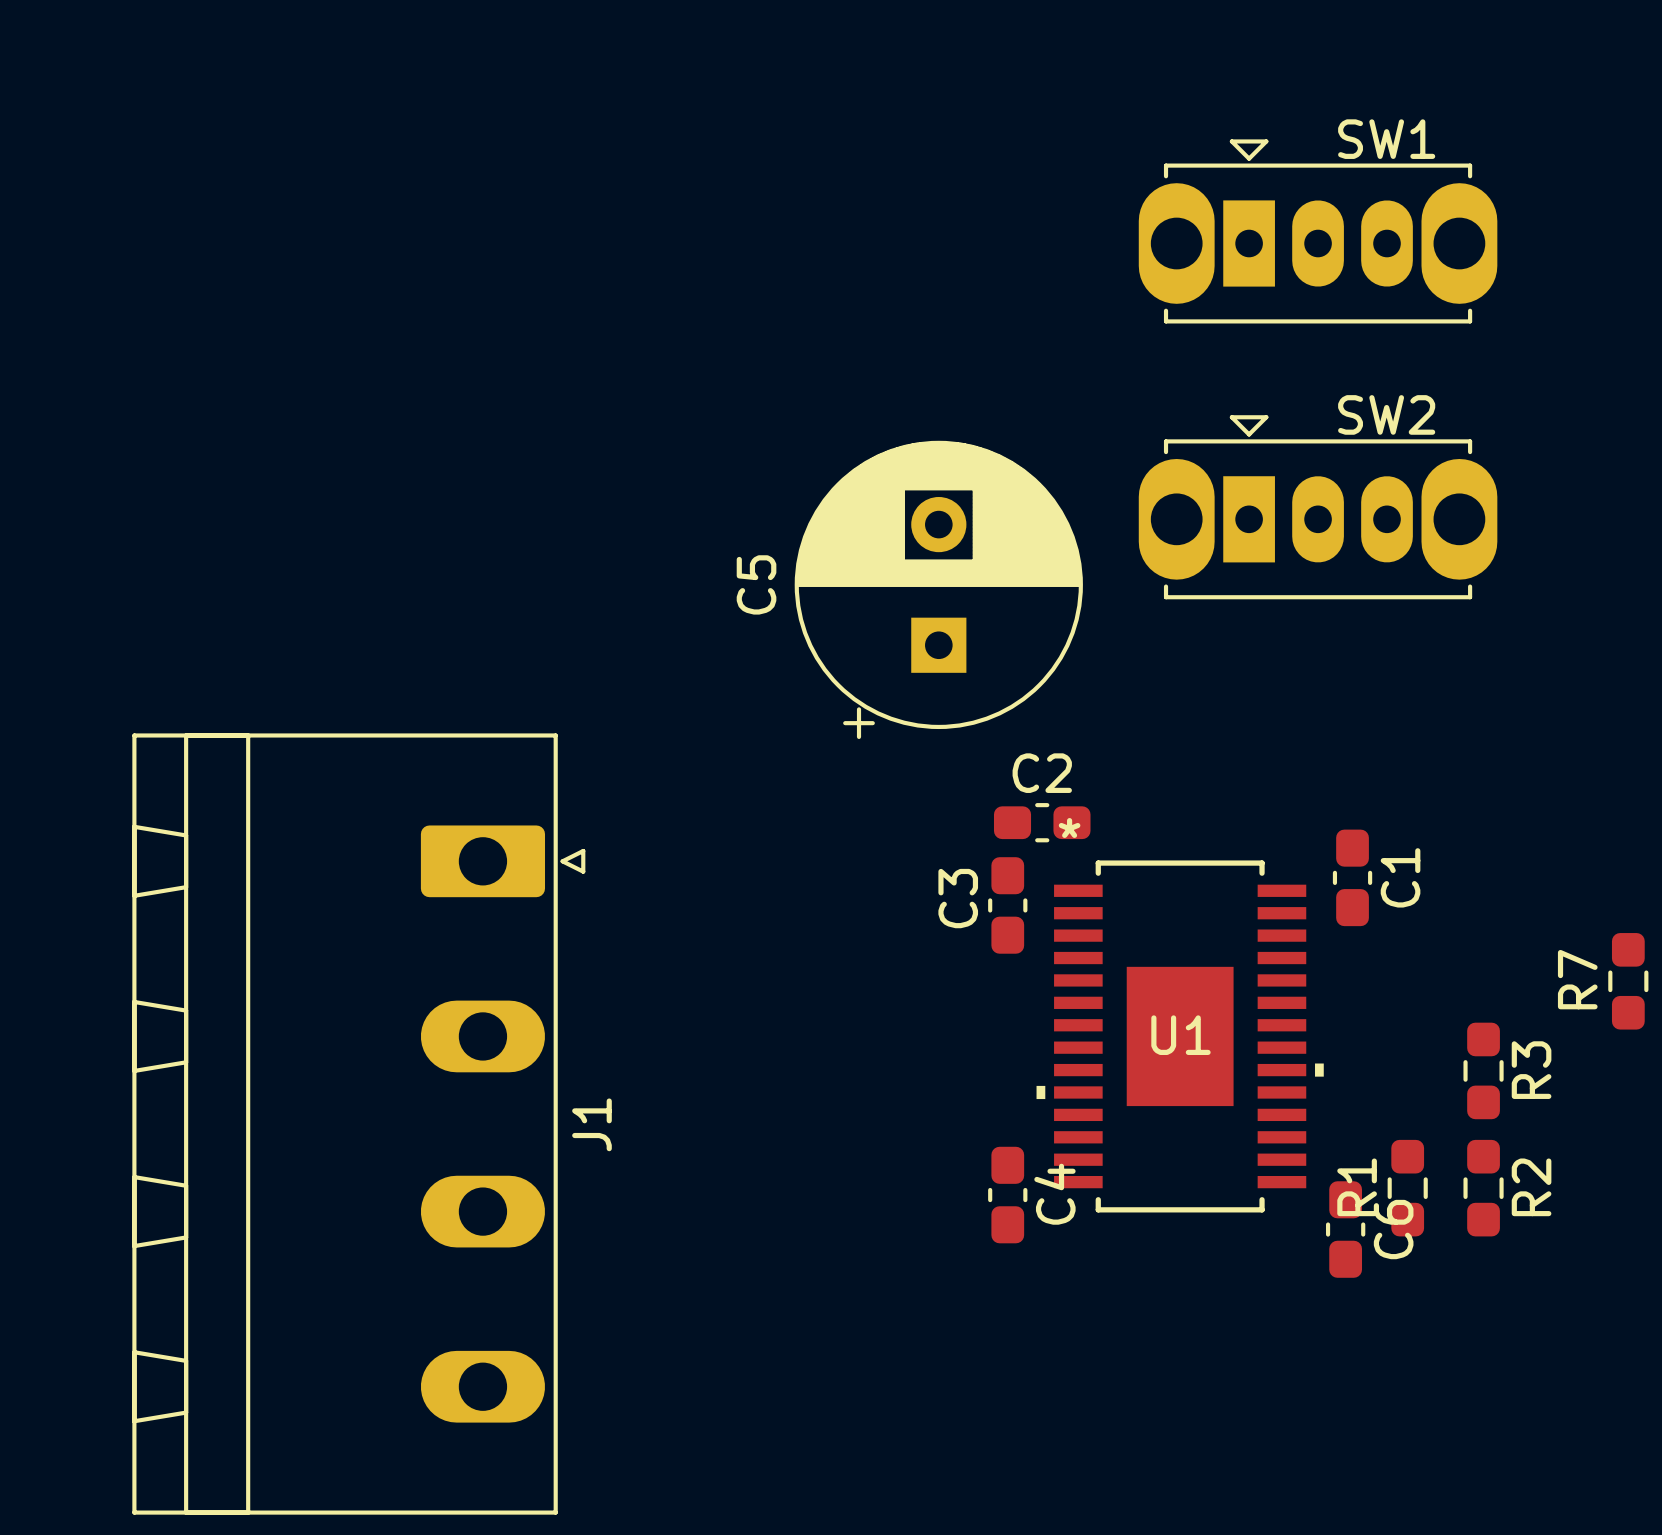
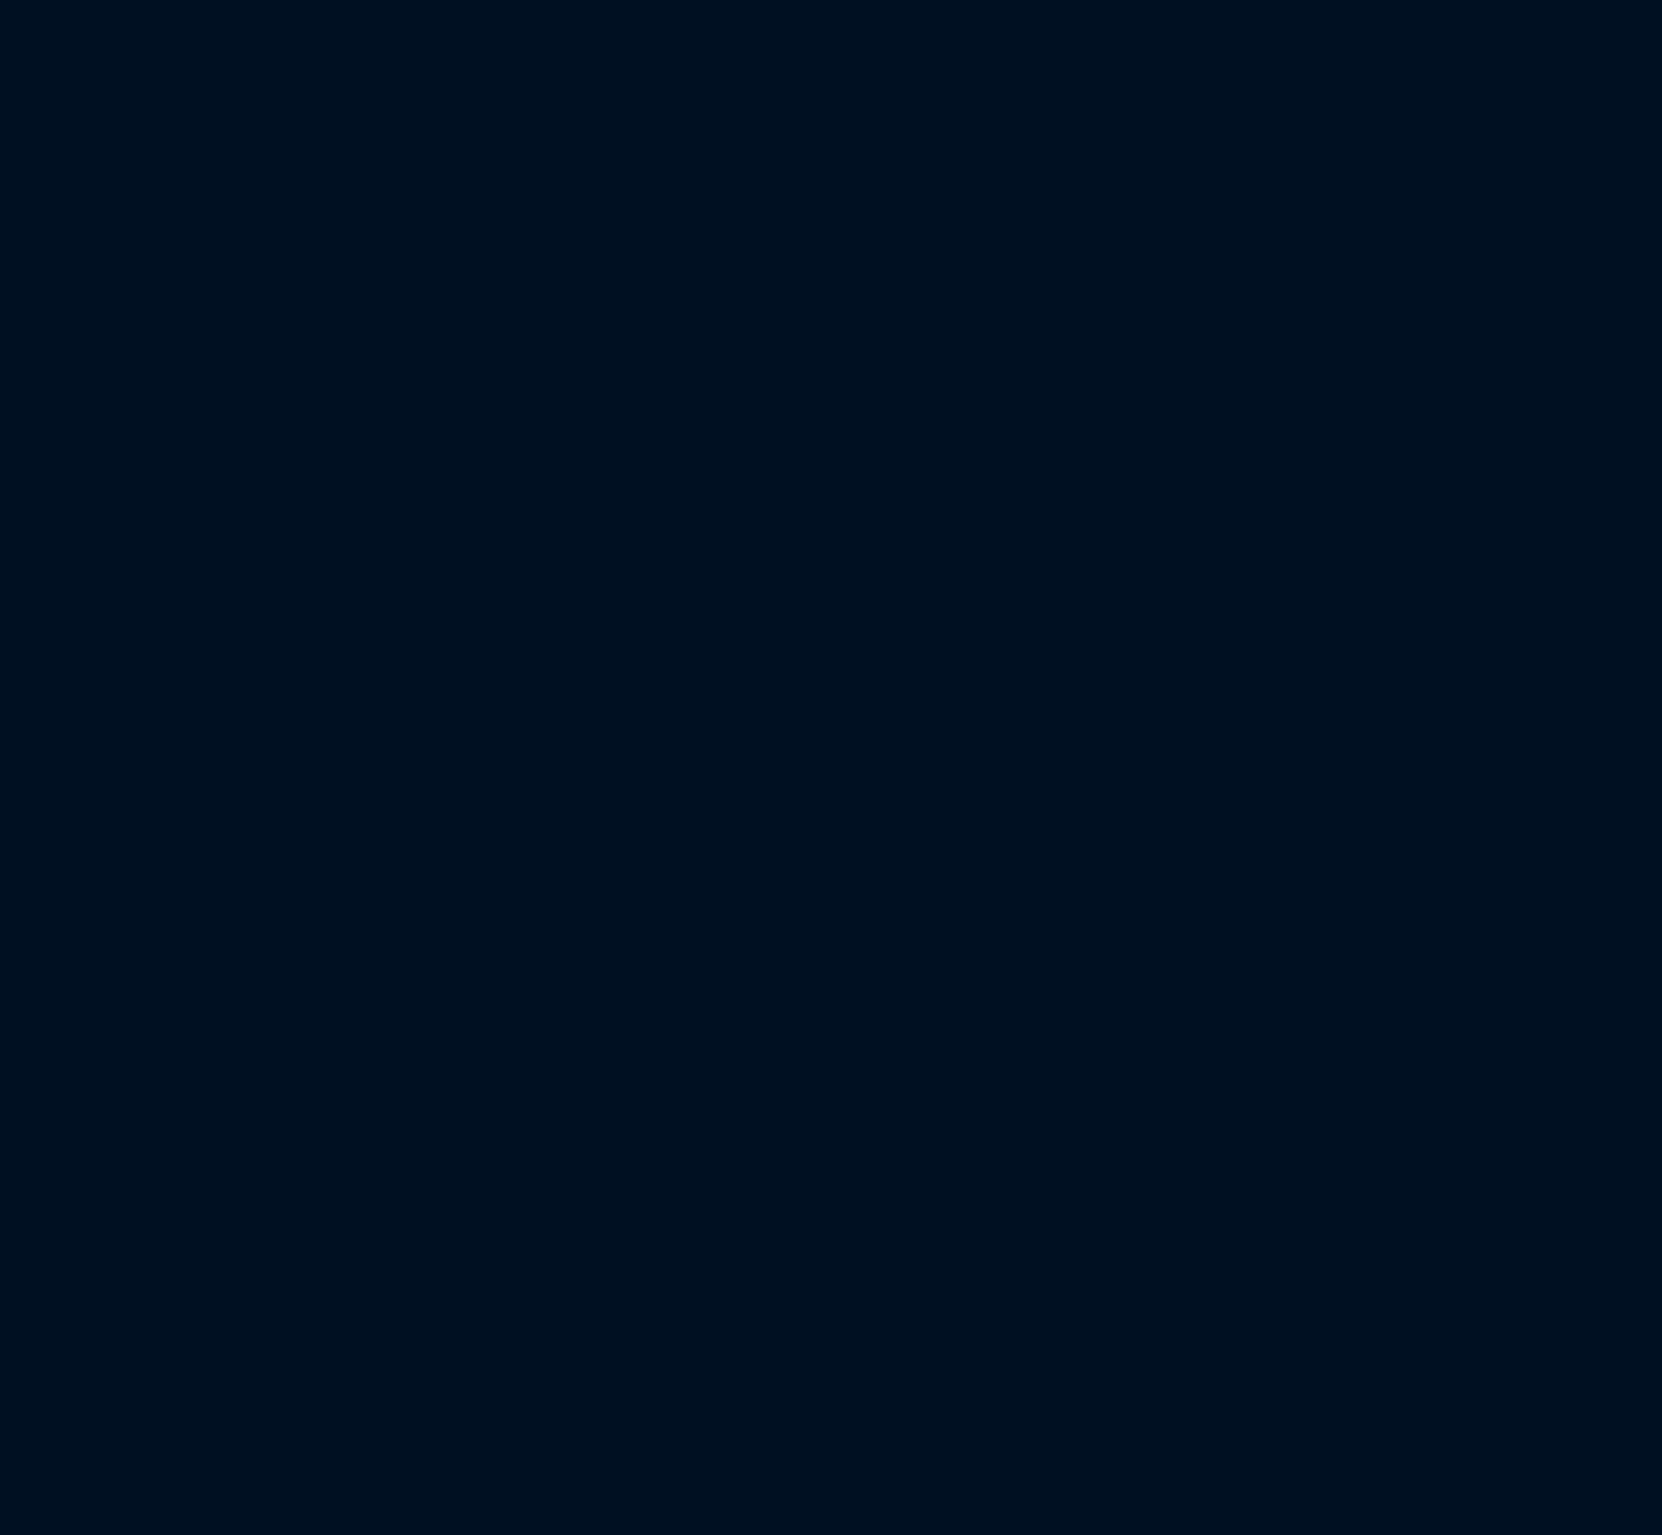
SW1: (1318, 231) -> none
SW2: (1318, 507) -> none
C5: (938, 589) -> none
C2: (1042, 822) -> none
C1: (1352, 877) -> none
C3: (1007, 905) -> none
R7: (1628, 981) -> none
U1: (1180, 1036) -> none
R3: (1483, 1070) -> none
J1: (358, 1124) -> none
R1: (1407, 1188) -> none
R2: (1483, 1188) -> none
C4: (1007, 1195) -> none
C6: (1345, 1229) -> none

